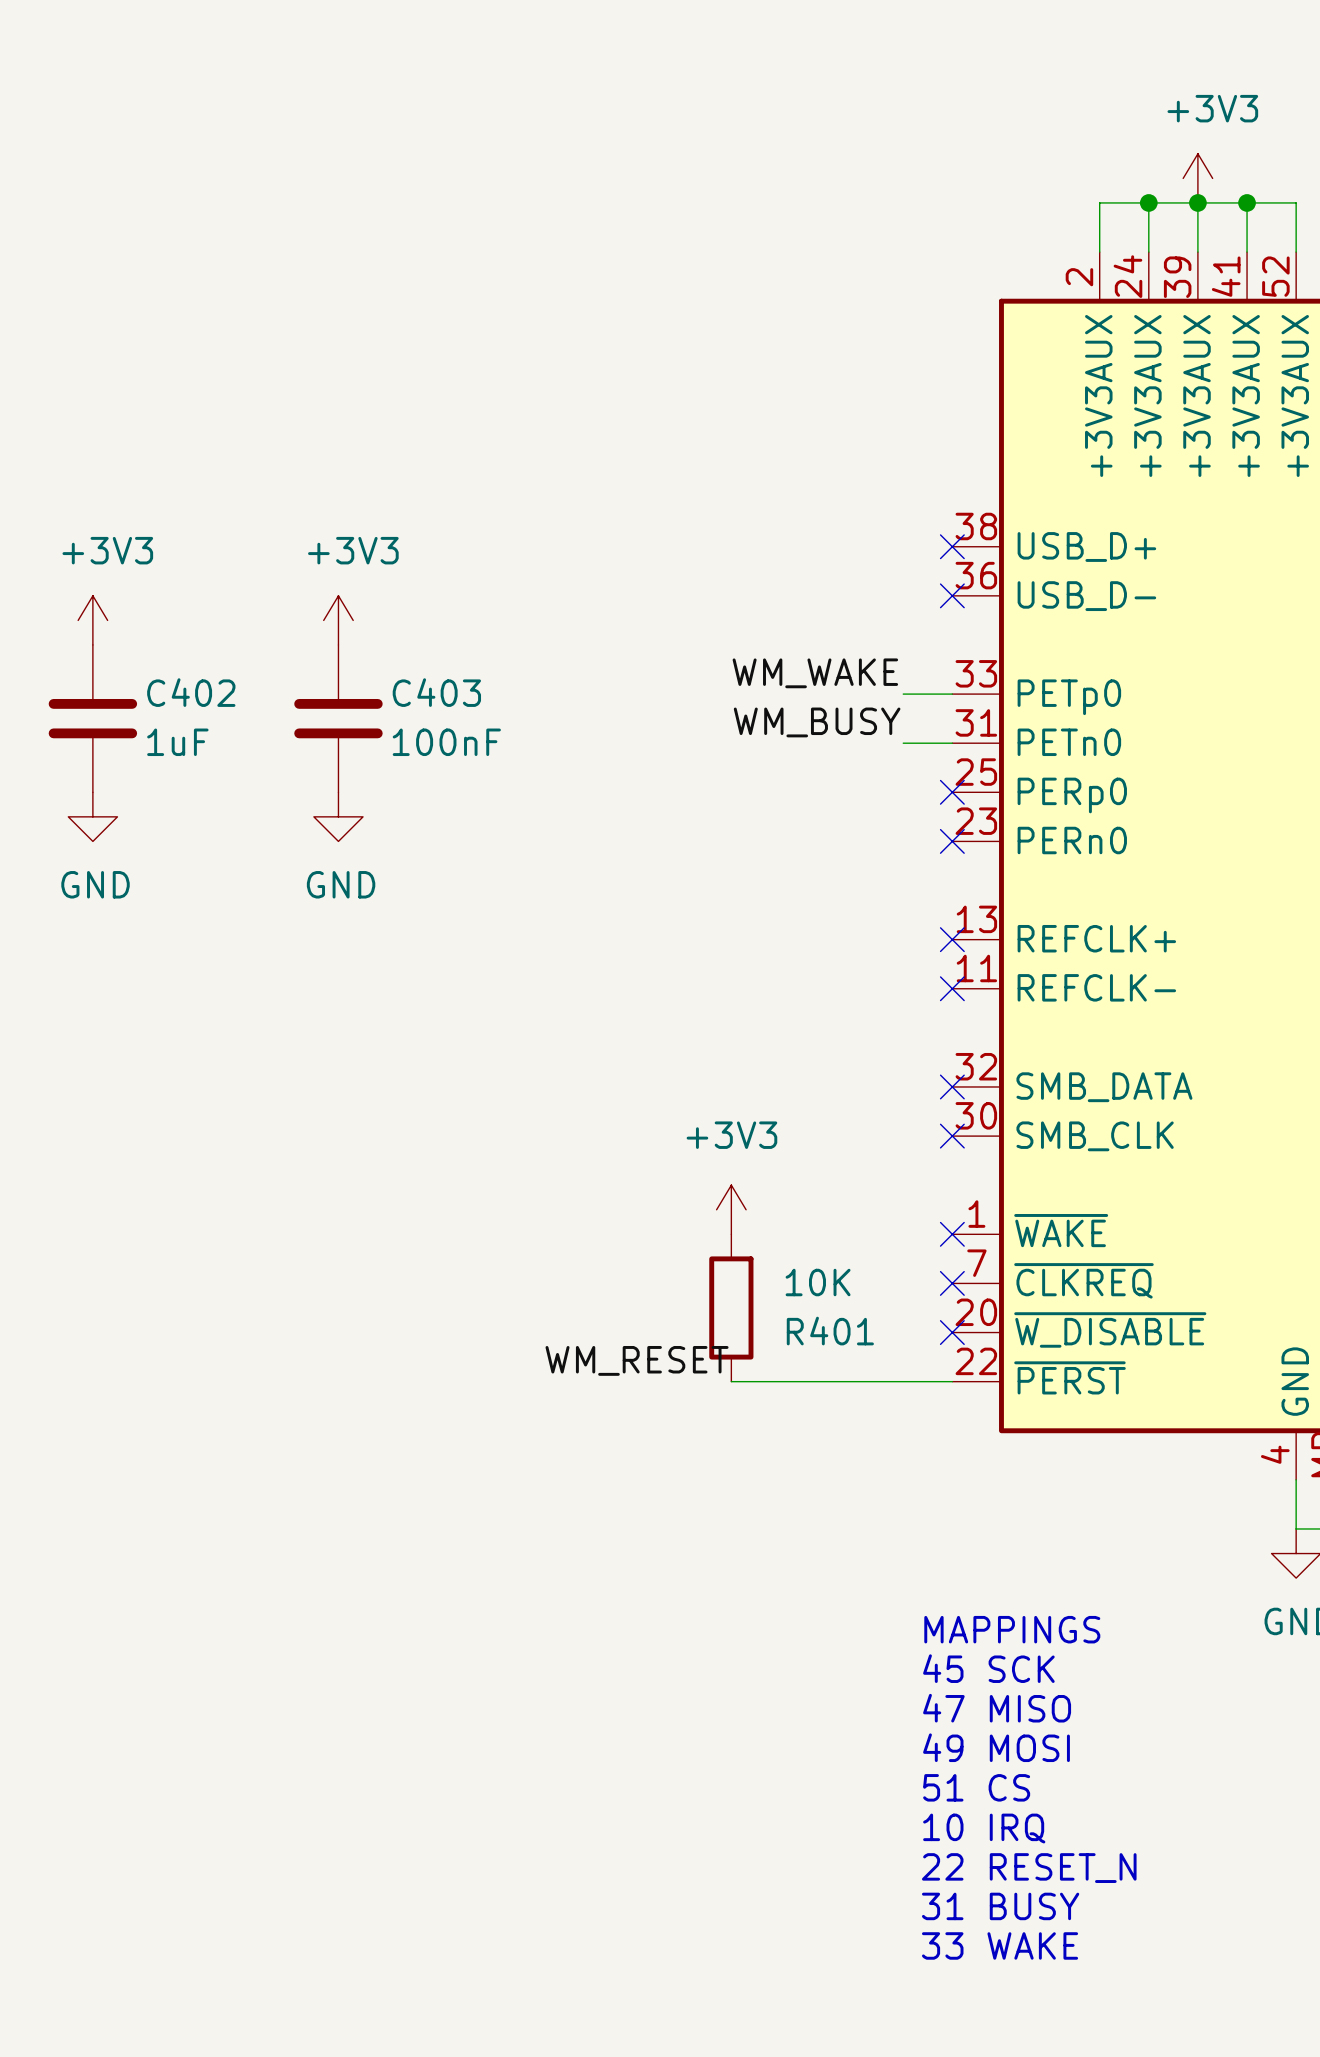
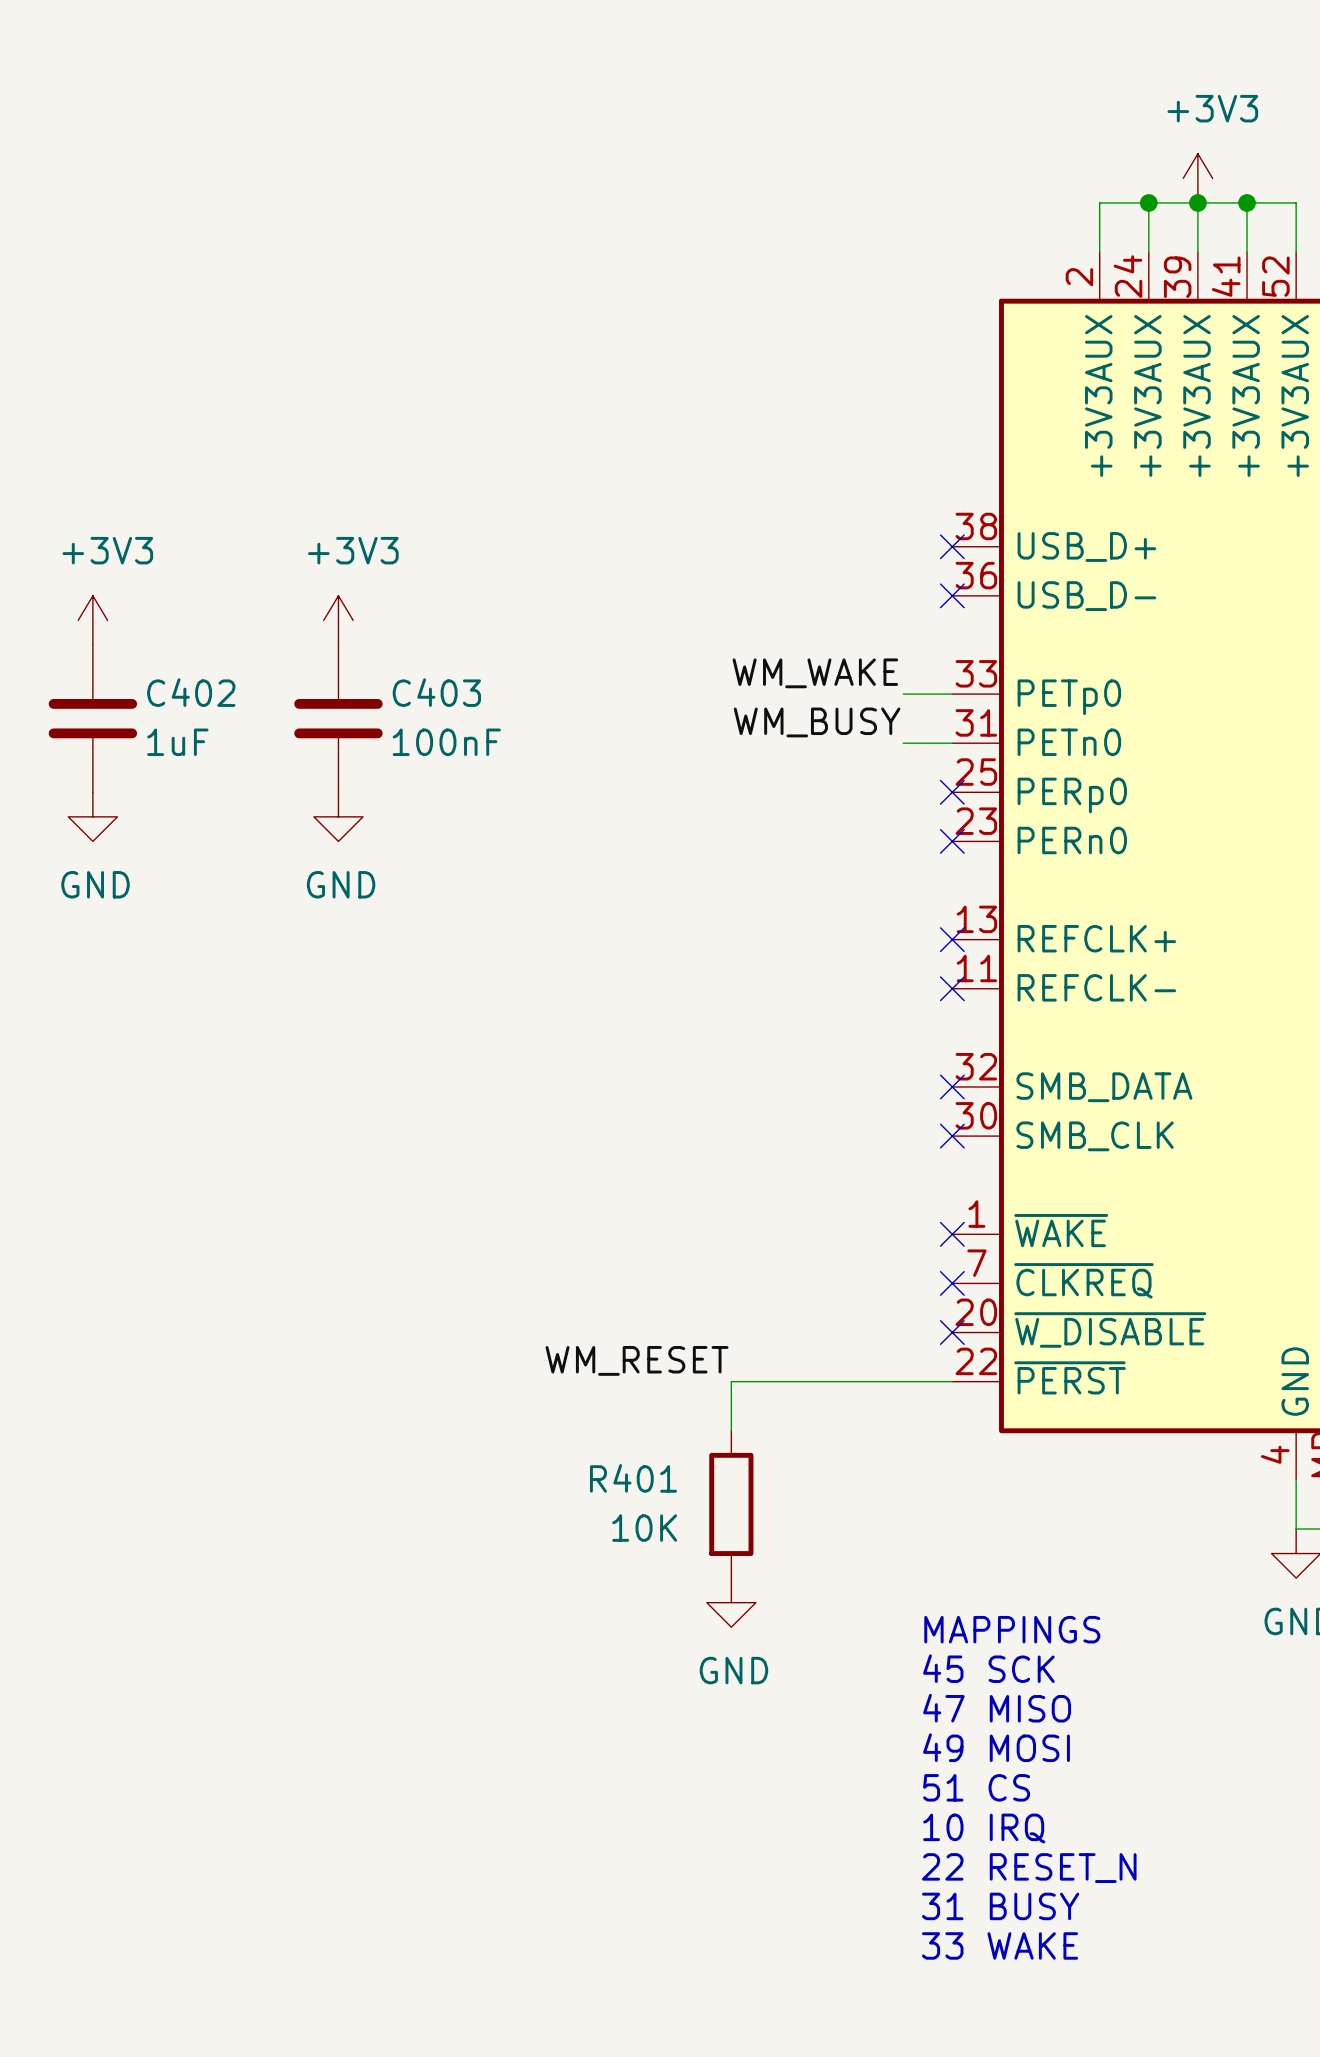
power symbol: +3V3 (731, 1209) -> none
R401 value position: 10K (818, 1282) -> 10K (644, 1528)
R401 position: (731, 1307) -> (731, 1504)
R401 name position: R401 (830, 1331) -> R401 (633, 1478)
wire: none -> (731, 1381) (731, 1430)
power symbol: none -> GND (731, 1602)

